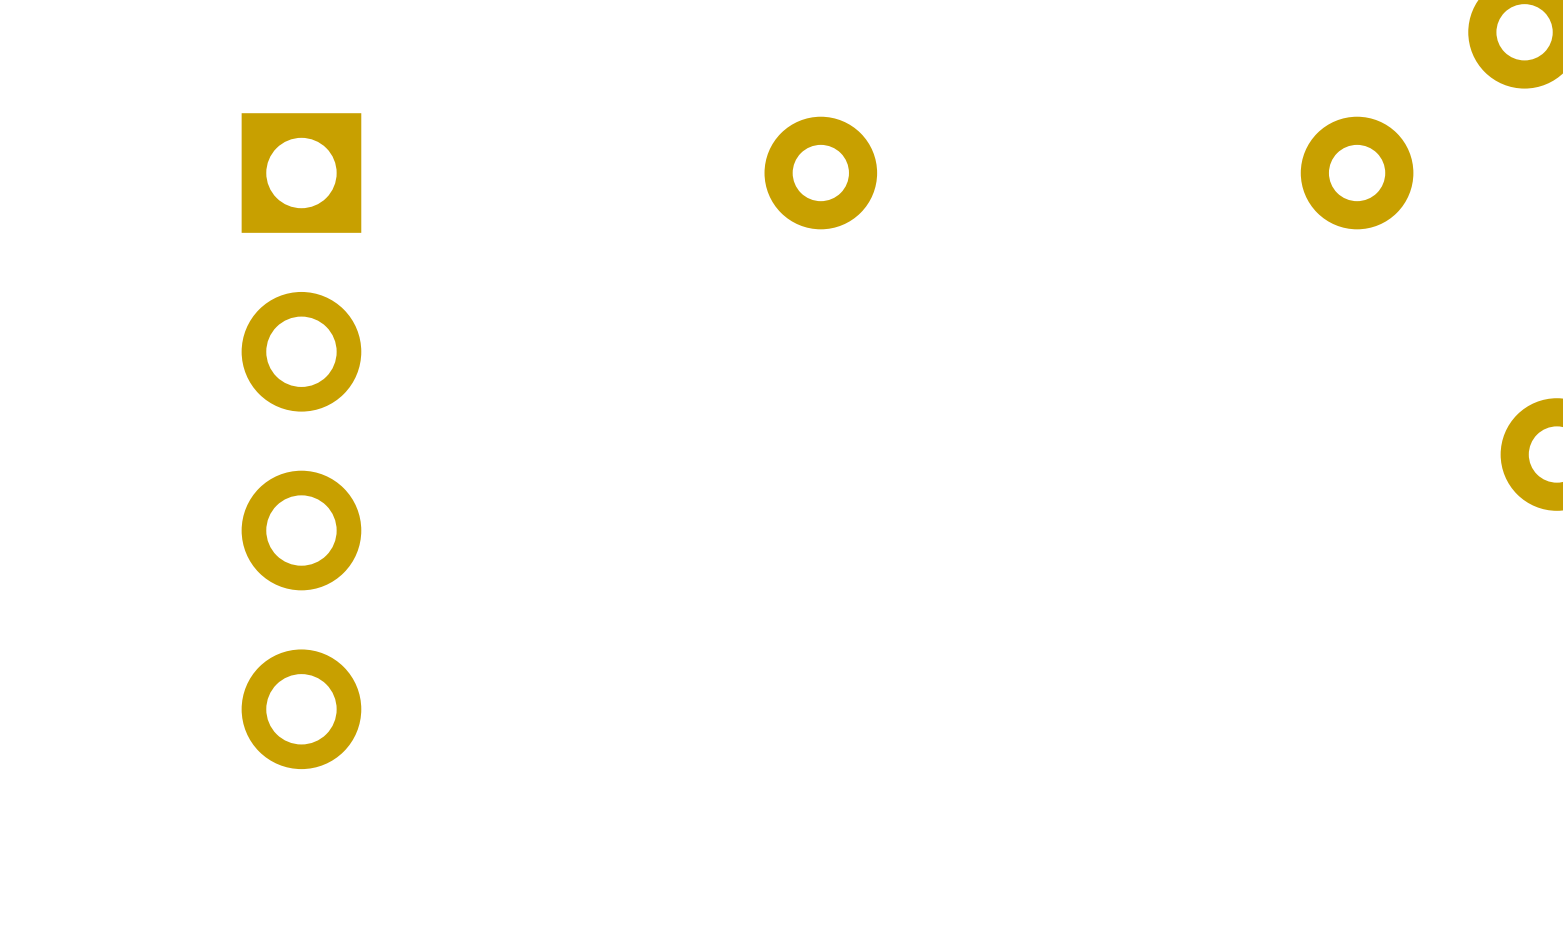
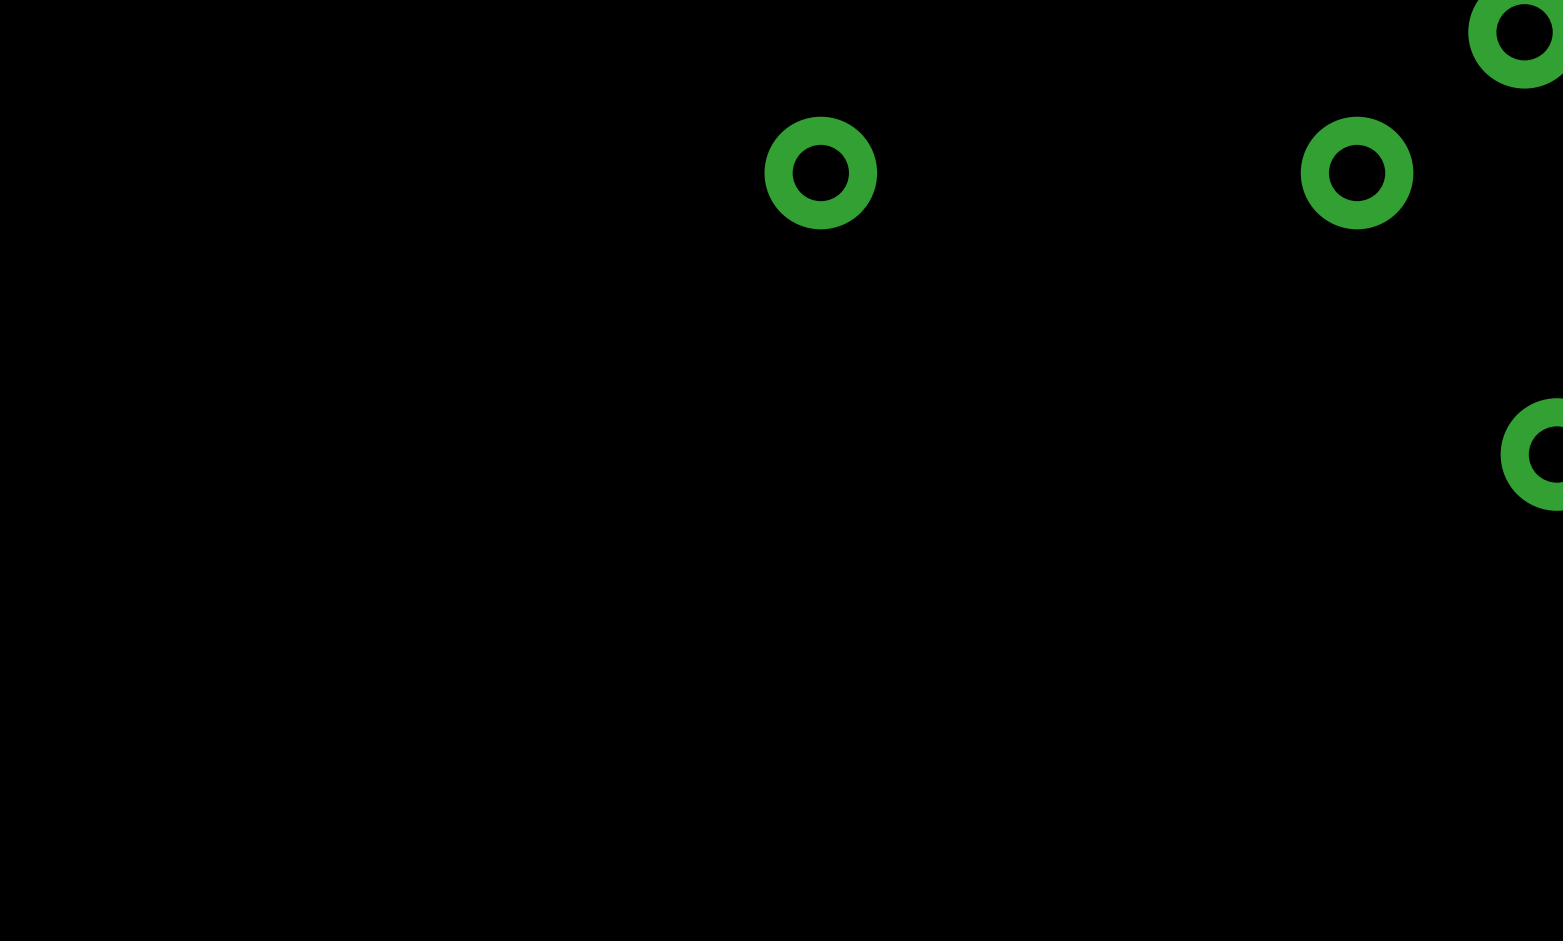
part: (301, 441) -> none

